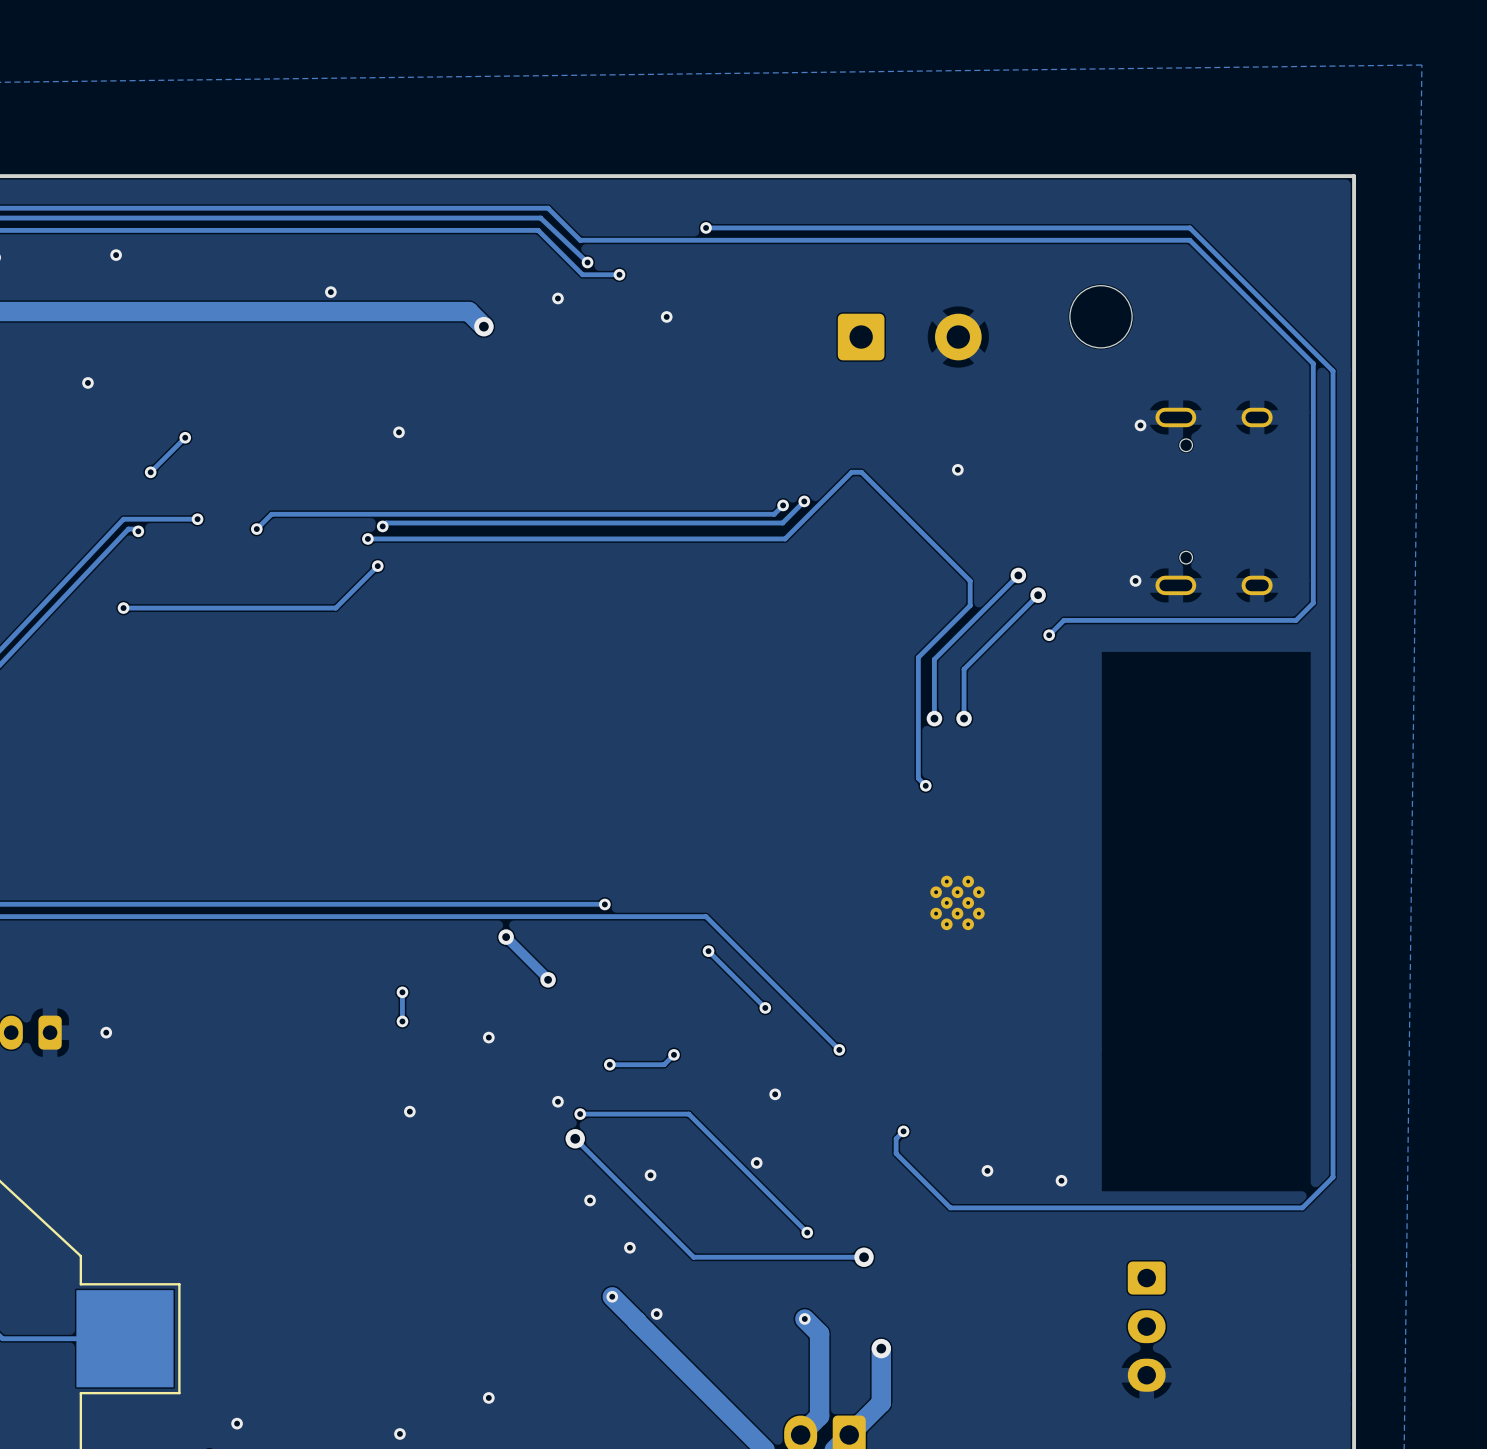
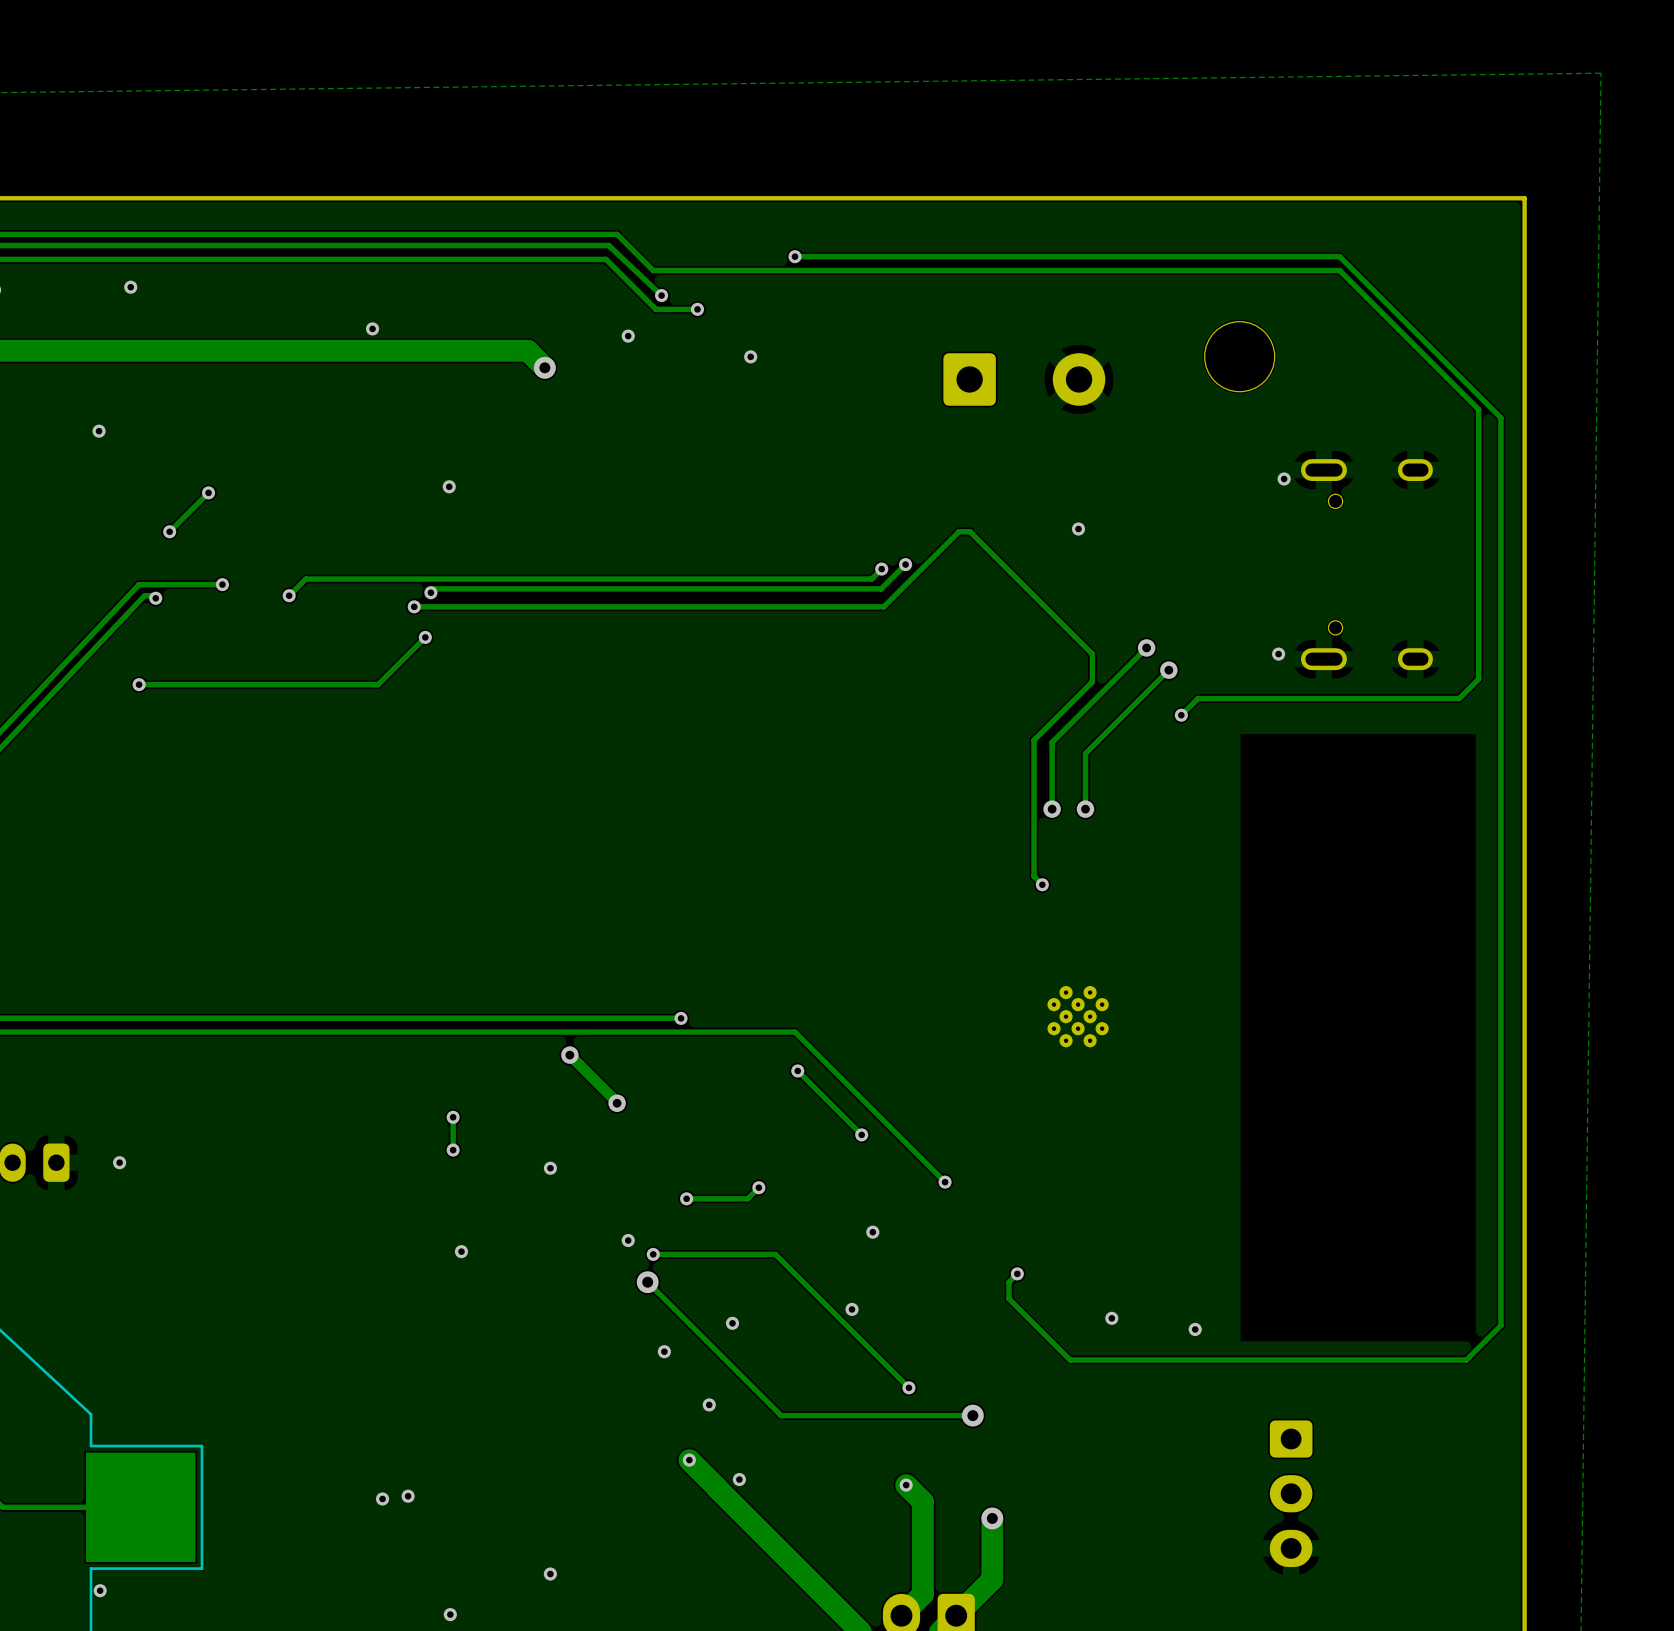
via: none -> (408, 1496)
via: none -> (382, 1498)
via: none -> (100, 1590)
via: (237, 1423) -> none

